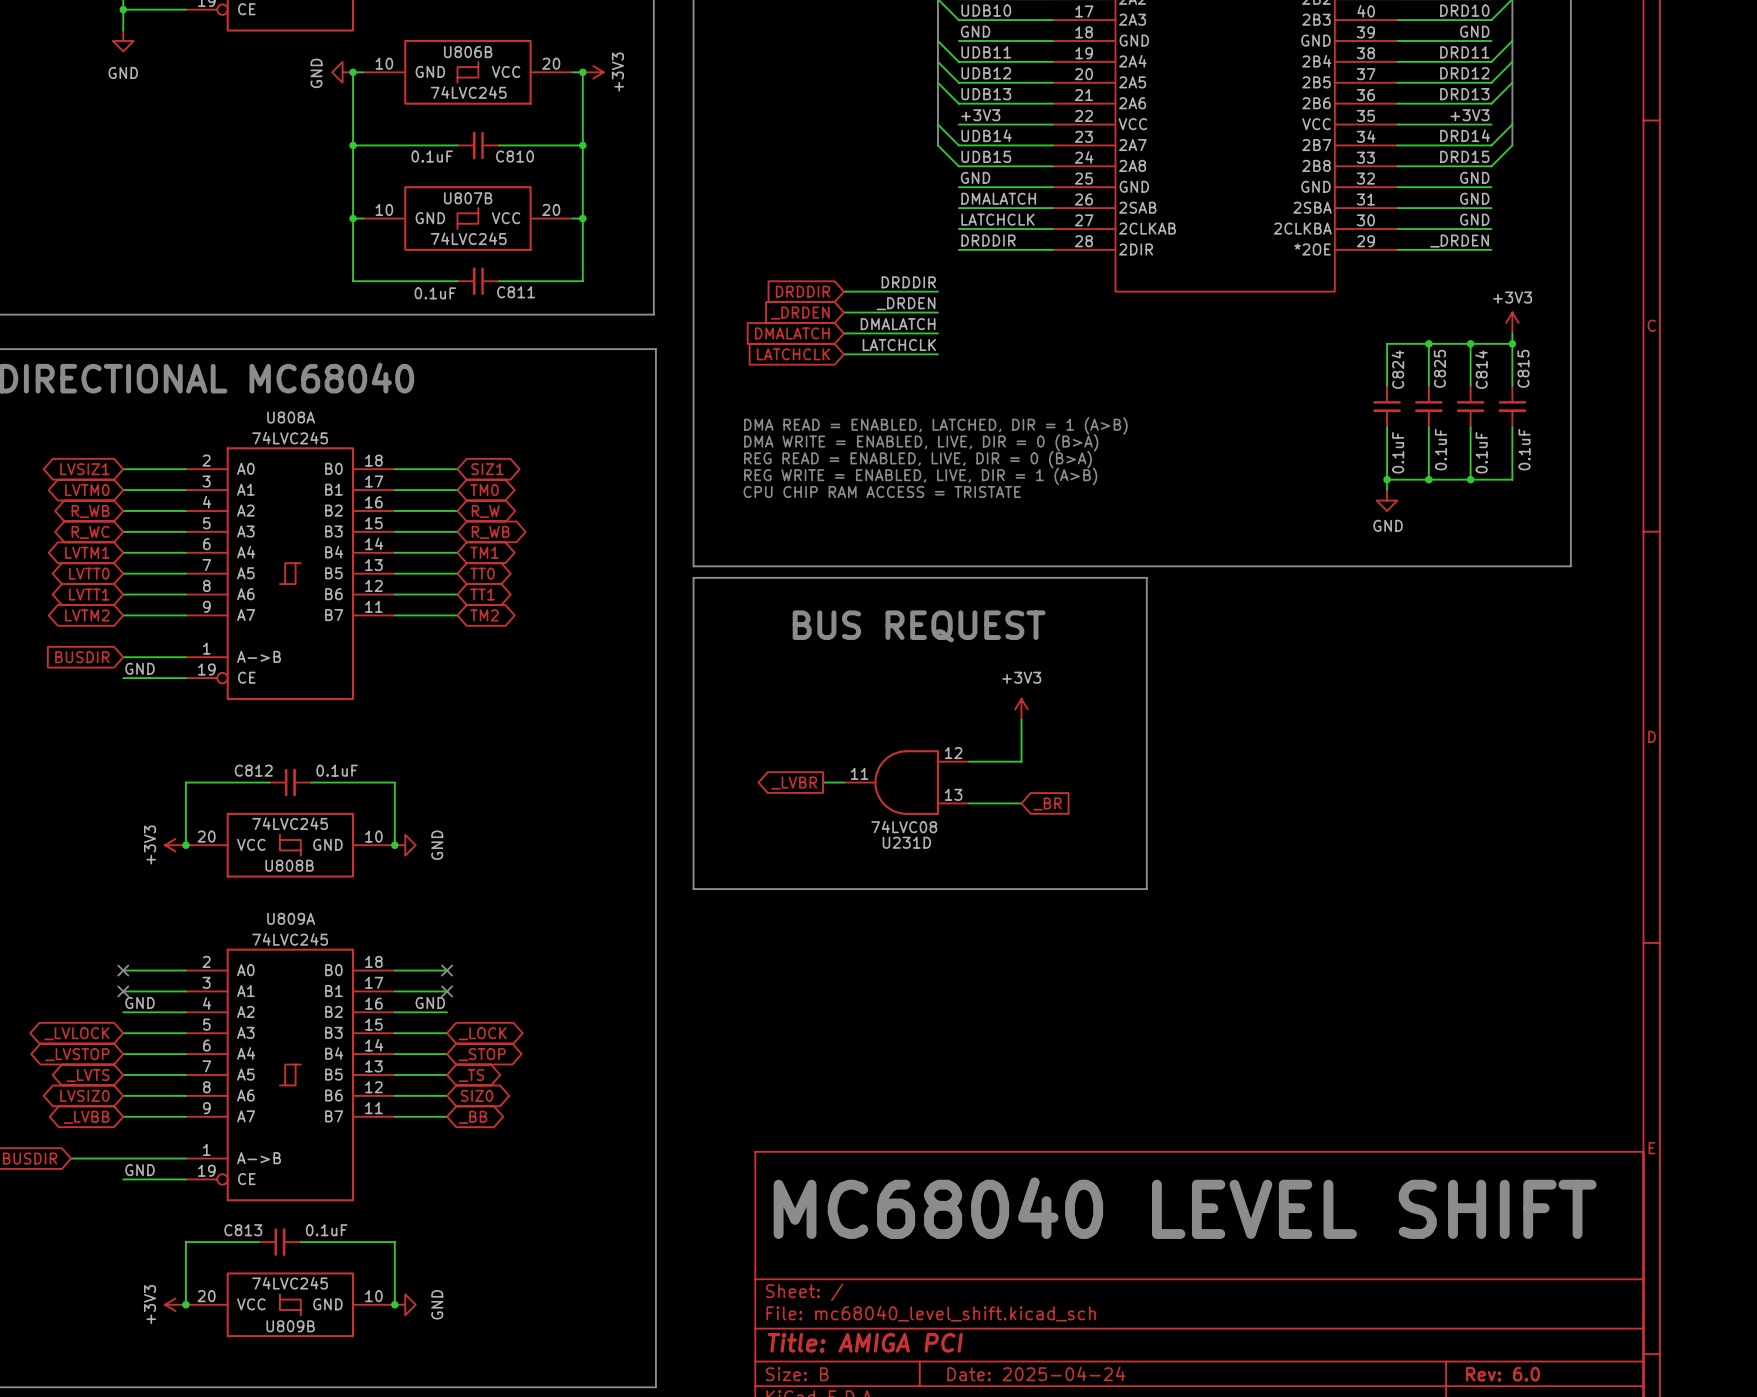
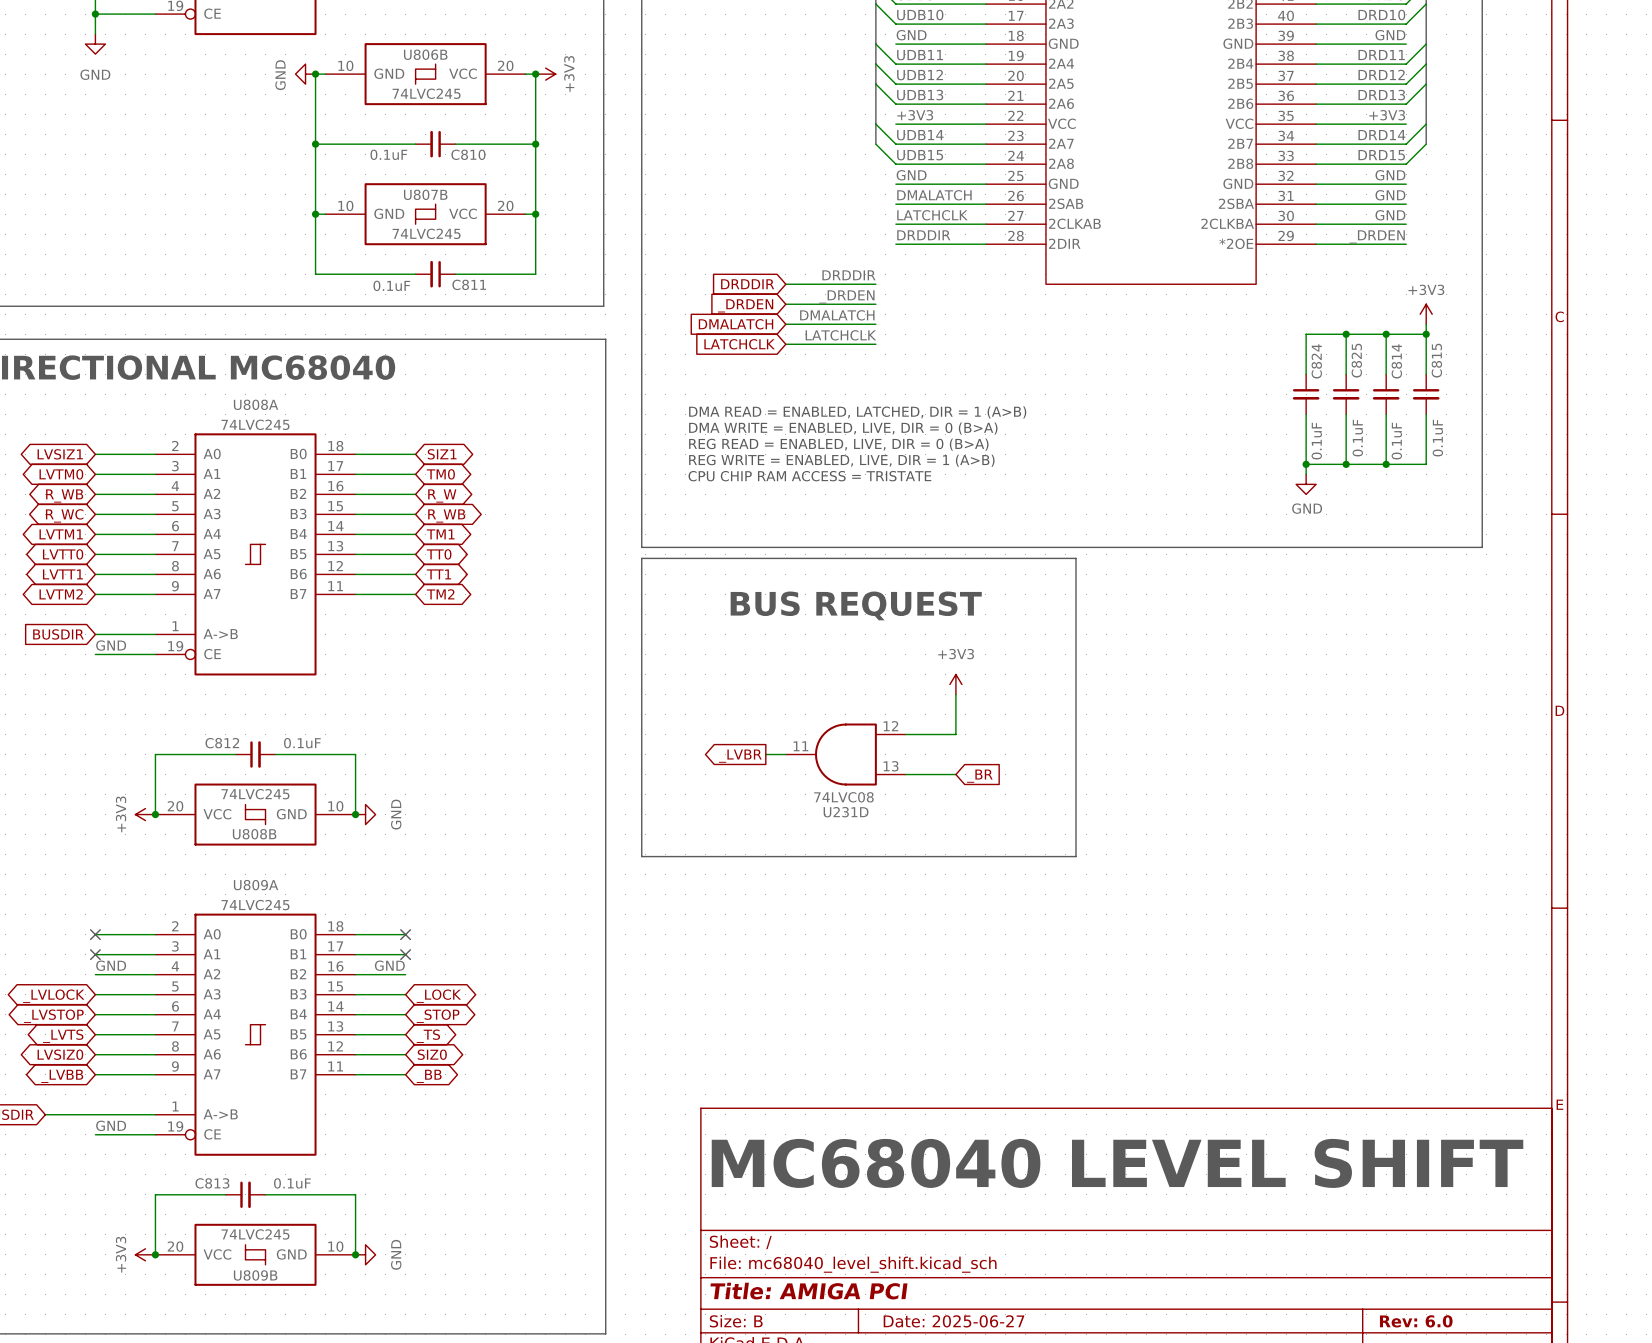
title block: Date: 2025-04-24 (1036, 1373) -> Date: 2025-06-27 (953, 1321)

